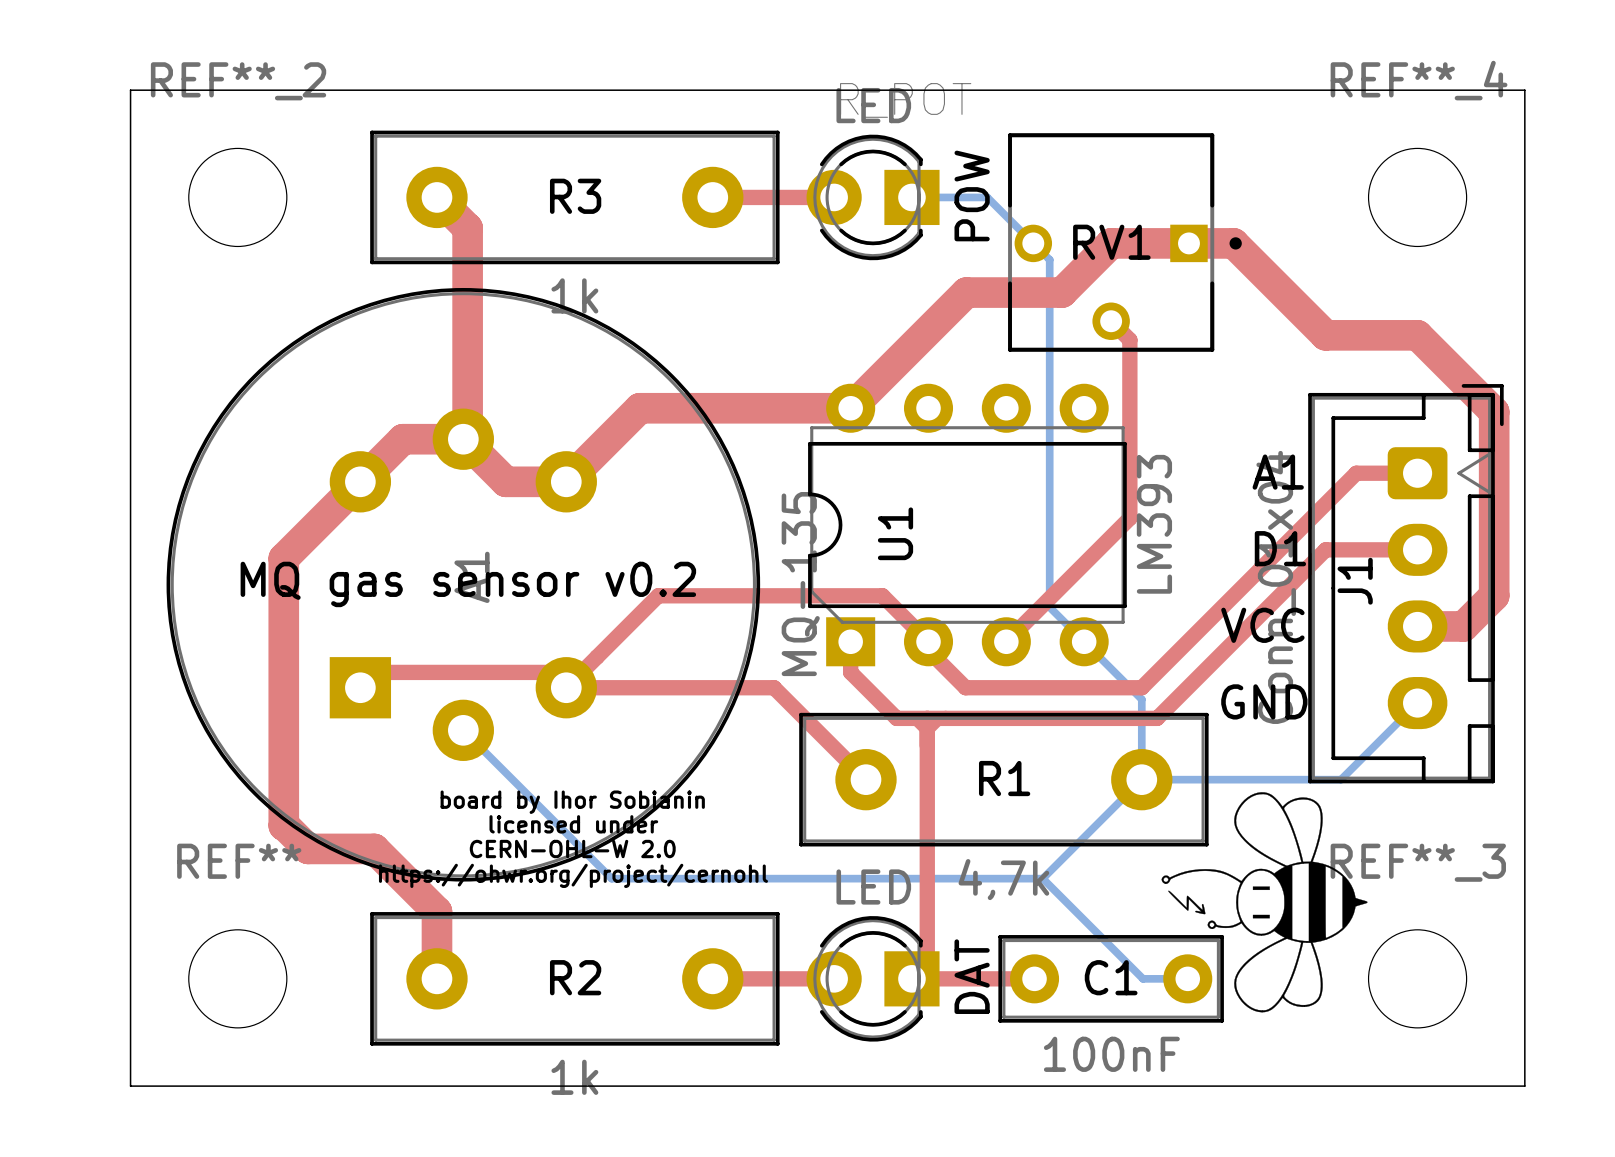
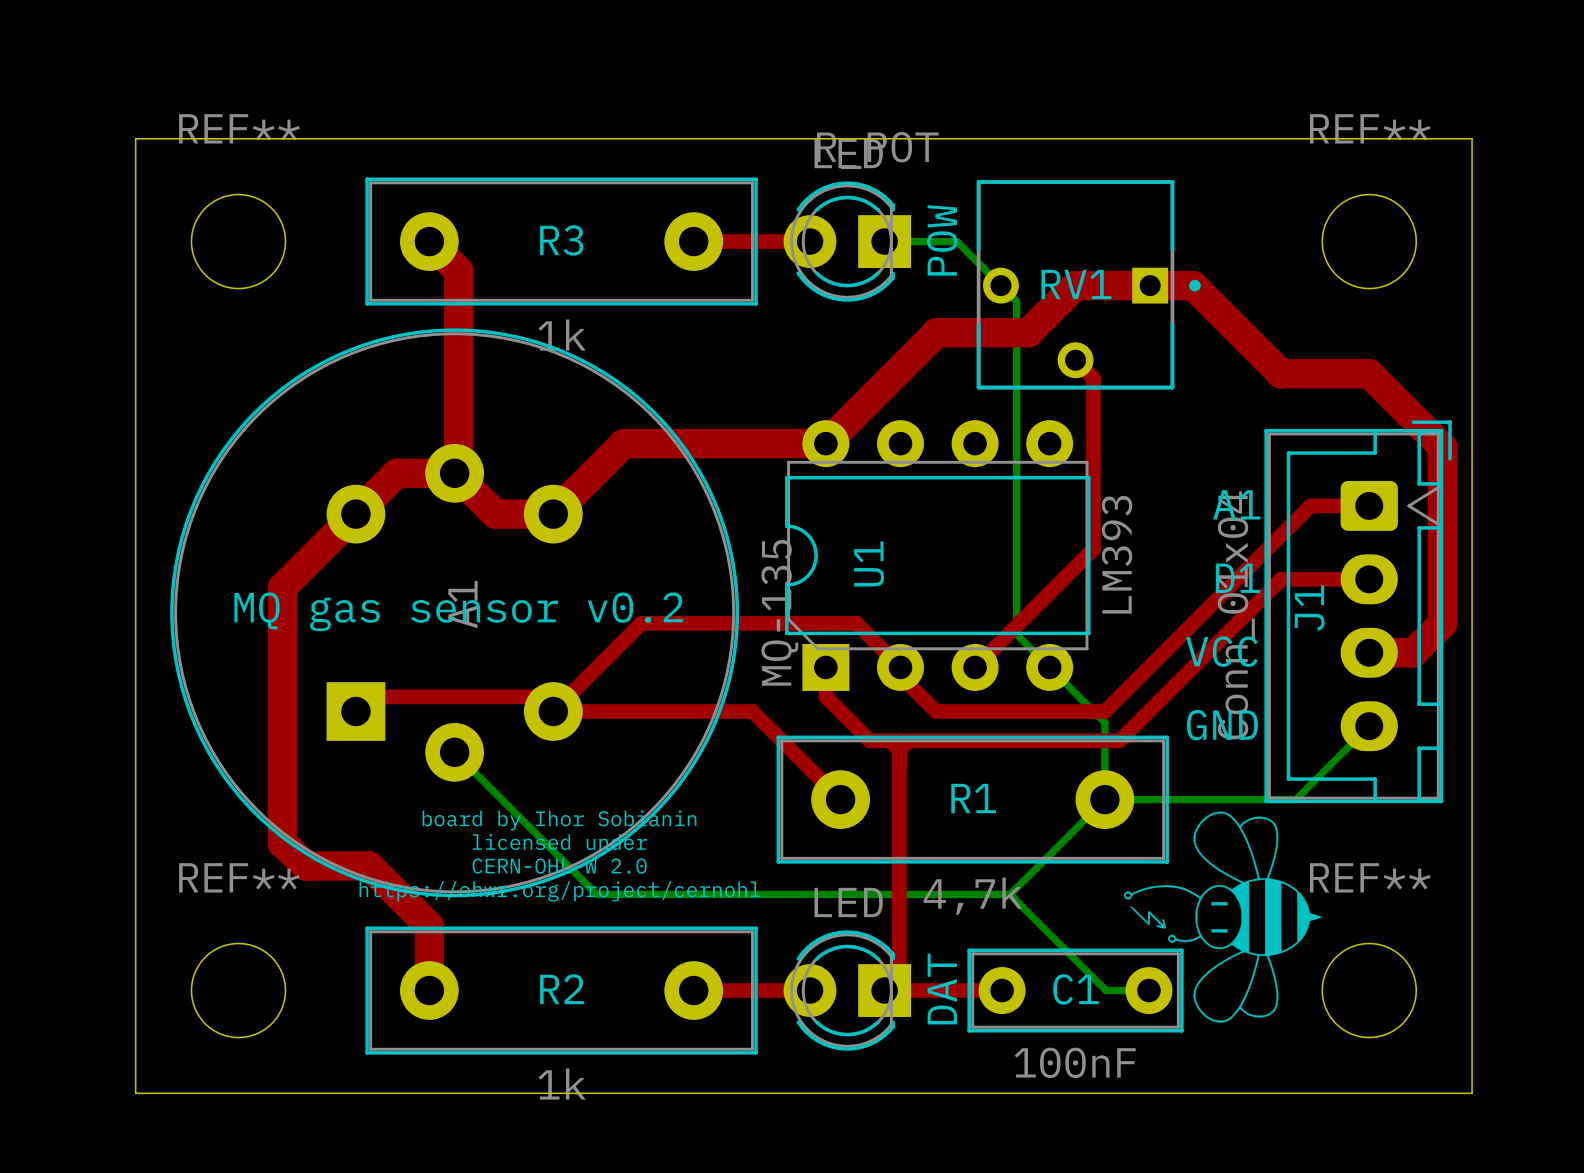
REF**_4 name: REF**_4 (1419, 80) -> REF** (1370, 128)
REF**_2 name: REF**_2 (238, 81) -> REF** (239, 128)
REF**_3 name: REF**_3 (1418, 862) -> REF** (1370, 877)

